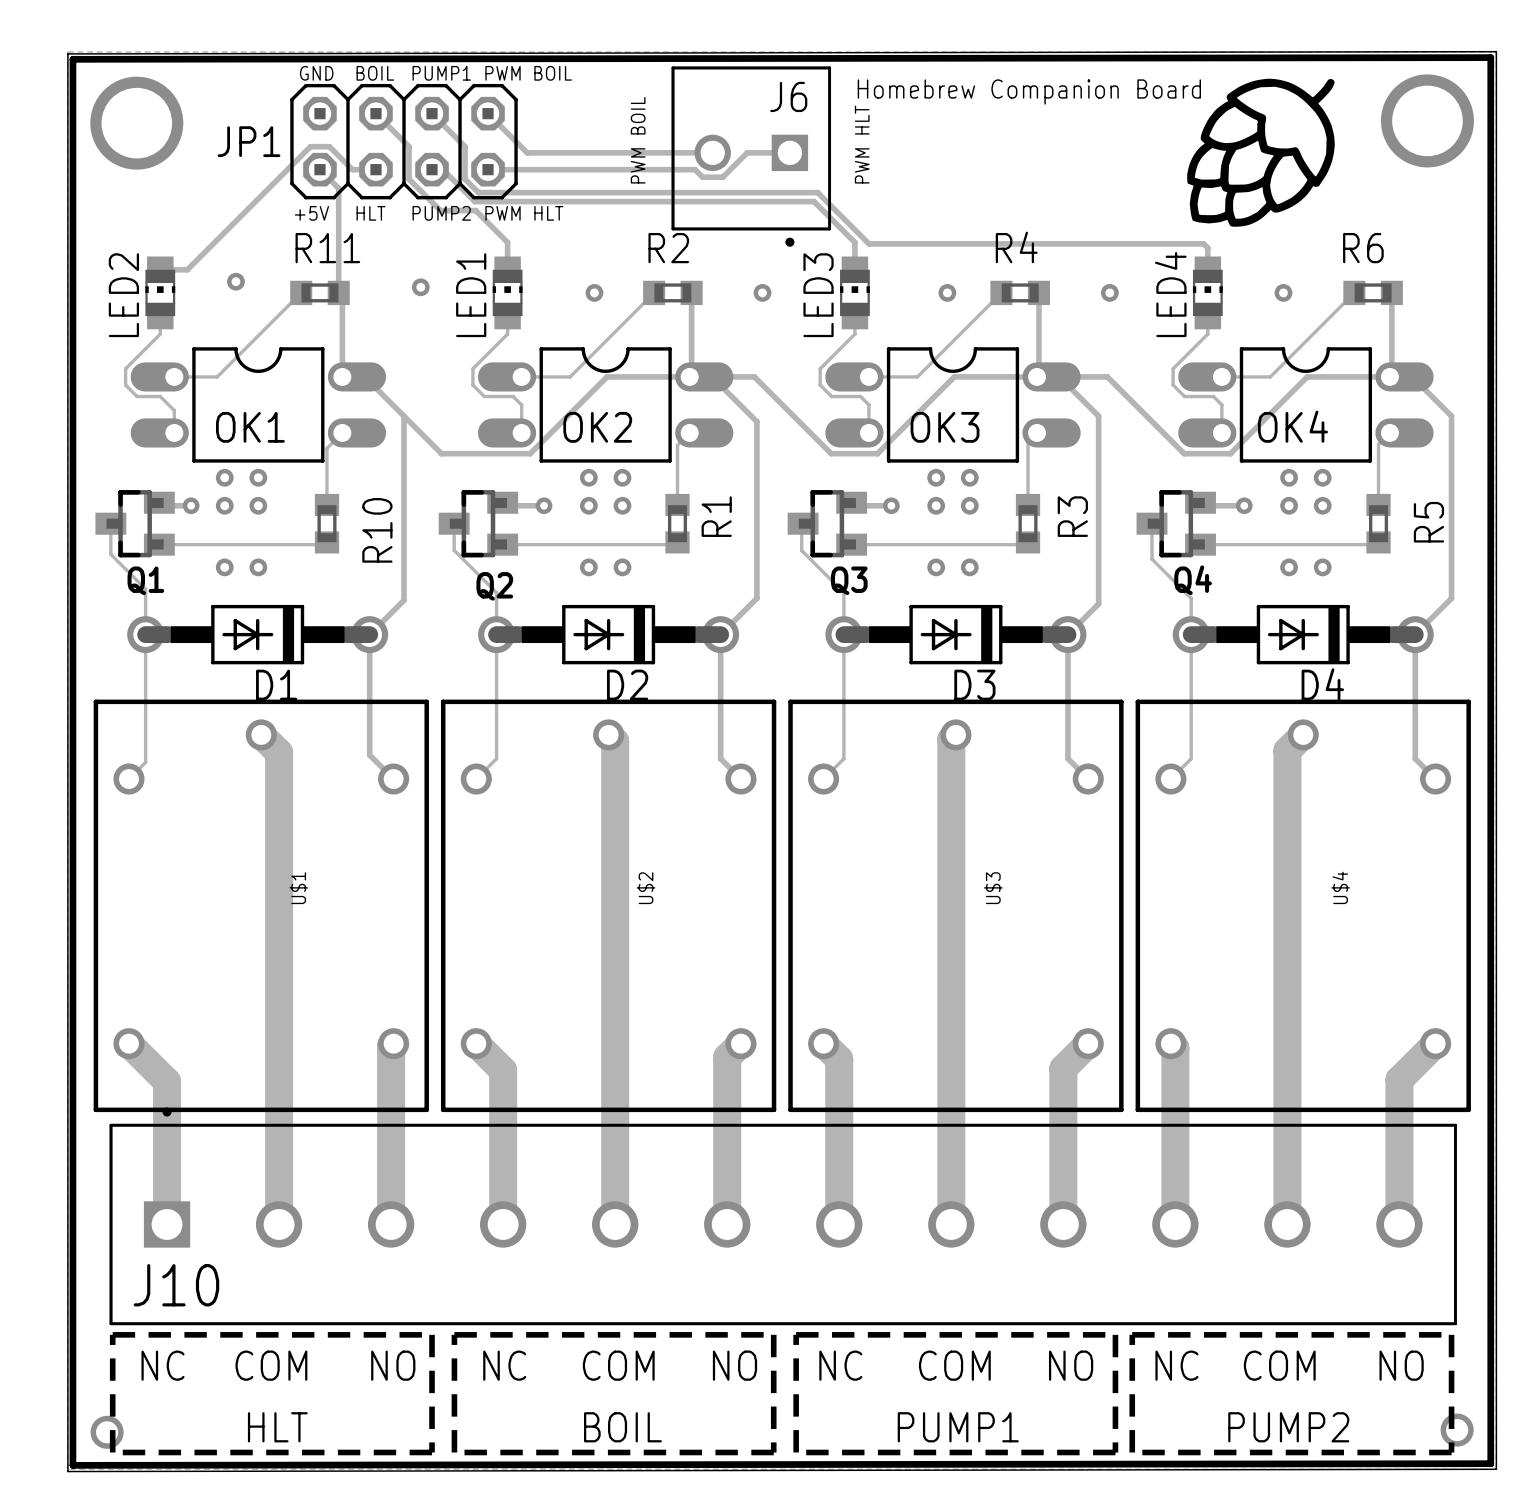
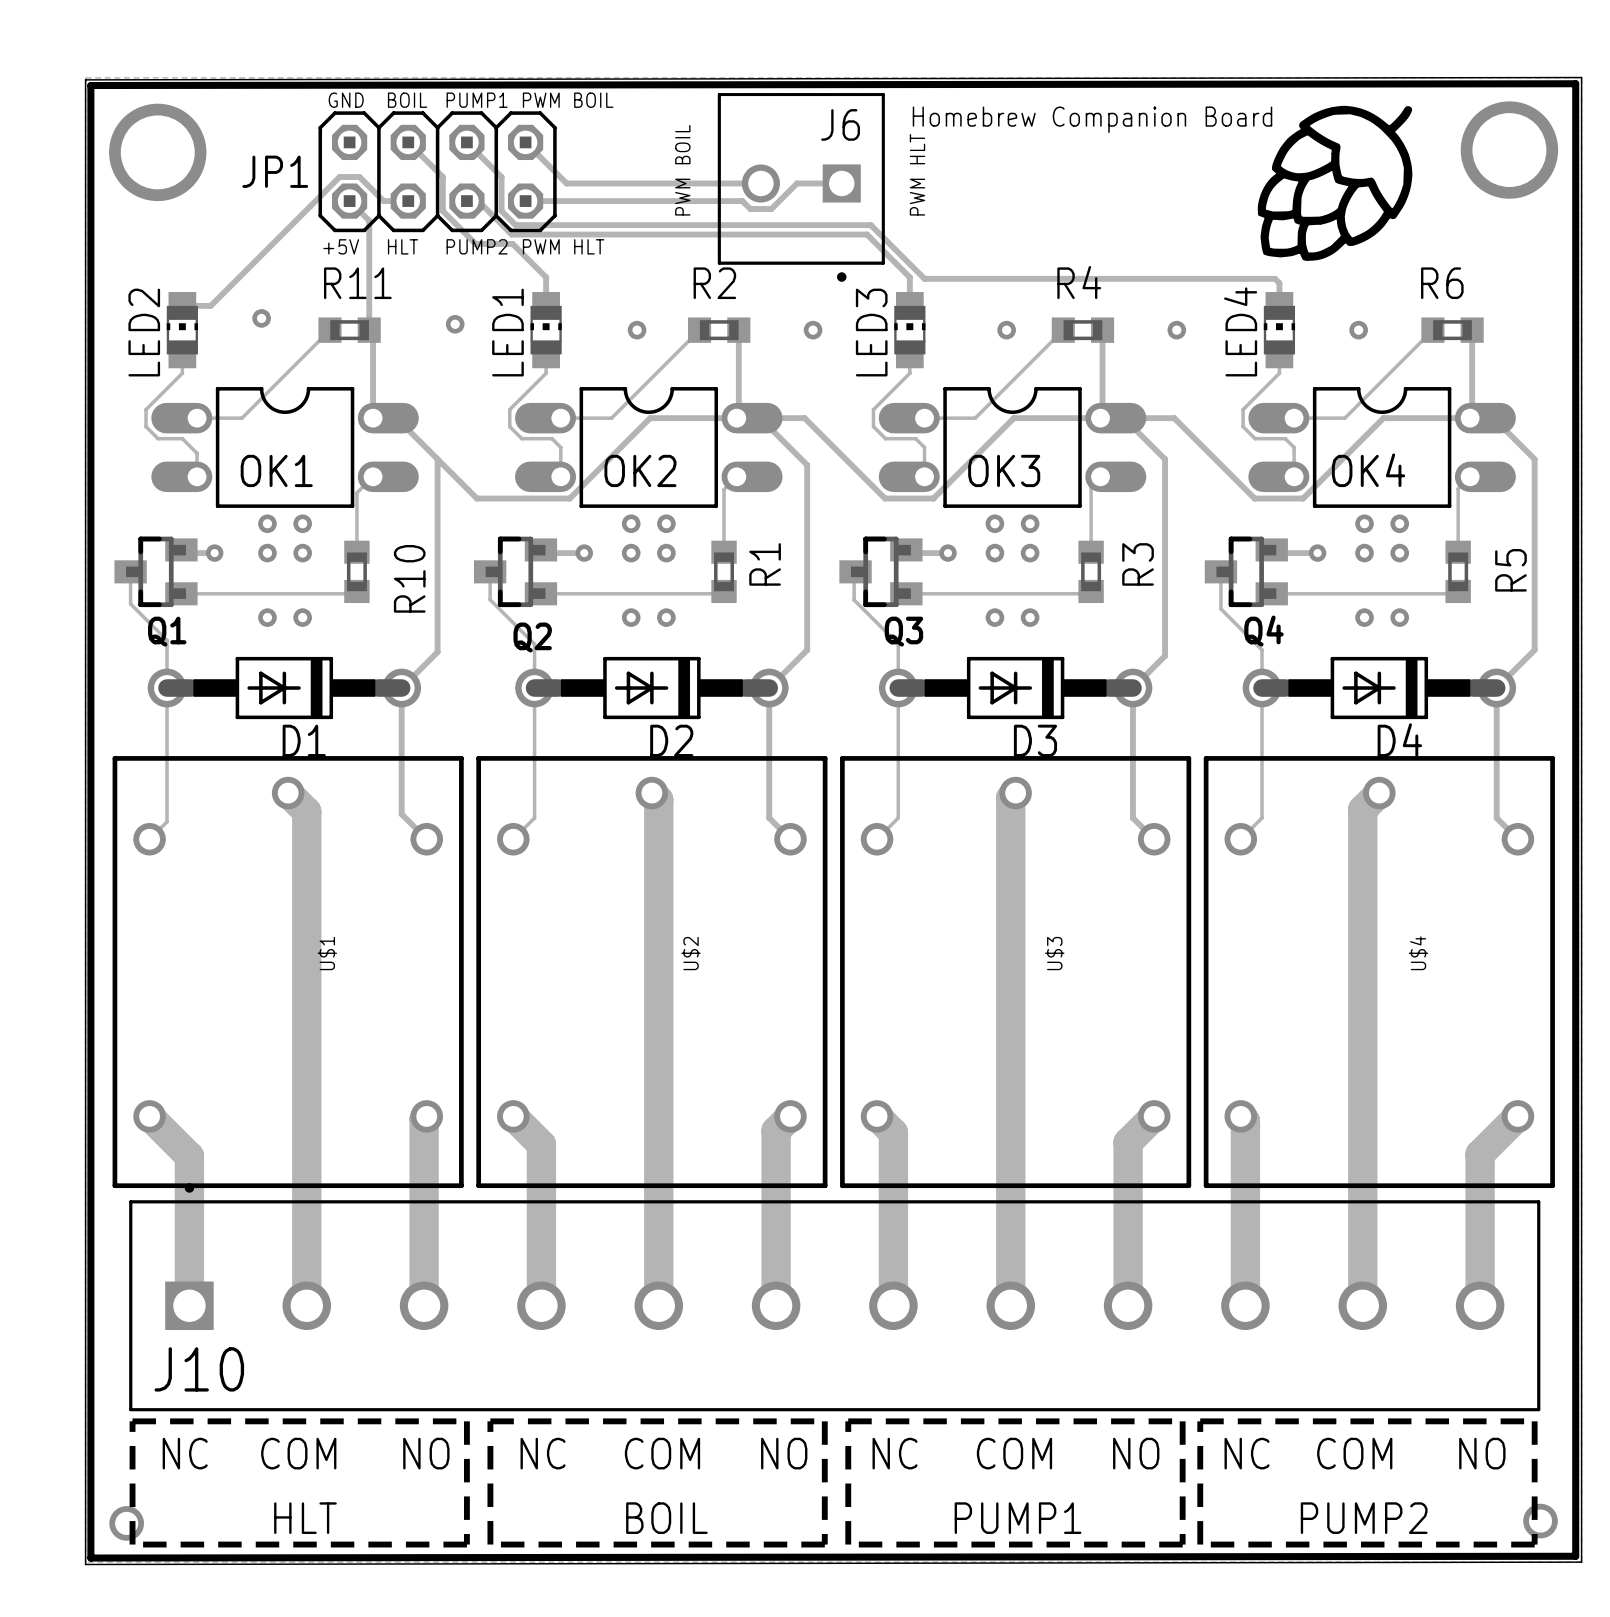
via: (224, 477) -> none
via: none -> (267, 523)
via: (258, 477) -> none
via: none -> (302, 523)
via: (224, 505) -> none
via: none -> (267, 553)
via: (258, 505) -> none
via: none -> (302, 553)
via: (224, 567) -> none
via: none -> (267, 617)
via: (258, 567) -> none
via: none -> (302, 617)

